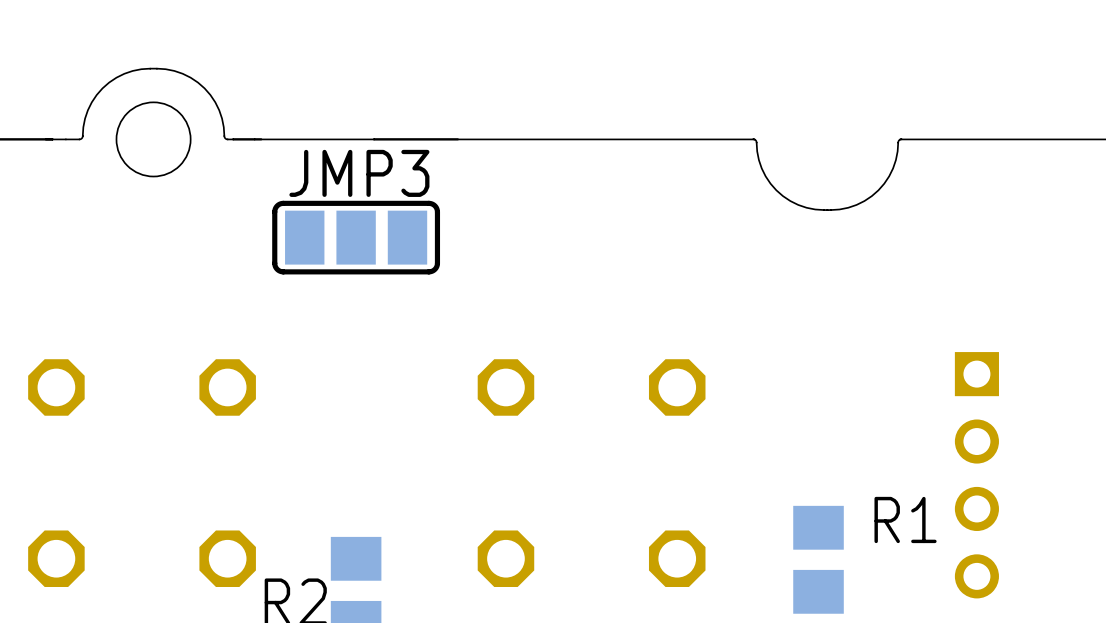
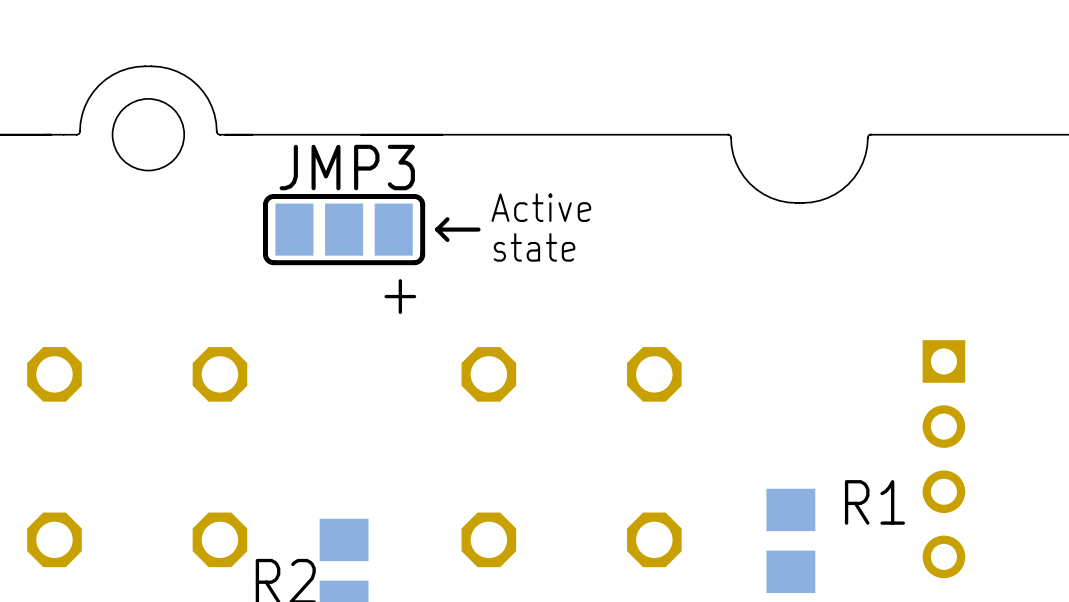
text: none -> Active (541, 207)
line: none -> (447, 219) (437, 229)
line: none -> (437, 229) (447, 239)
line: none -> (478, 229) (437, 229)
text: none -> state (534, 247)
text: none -> + (400, 296)

